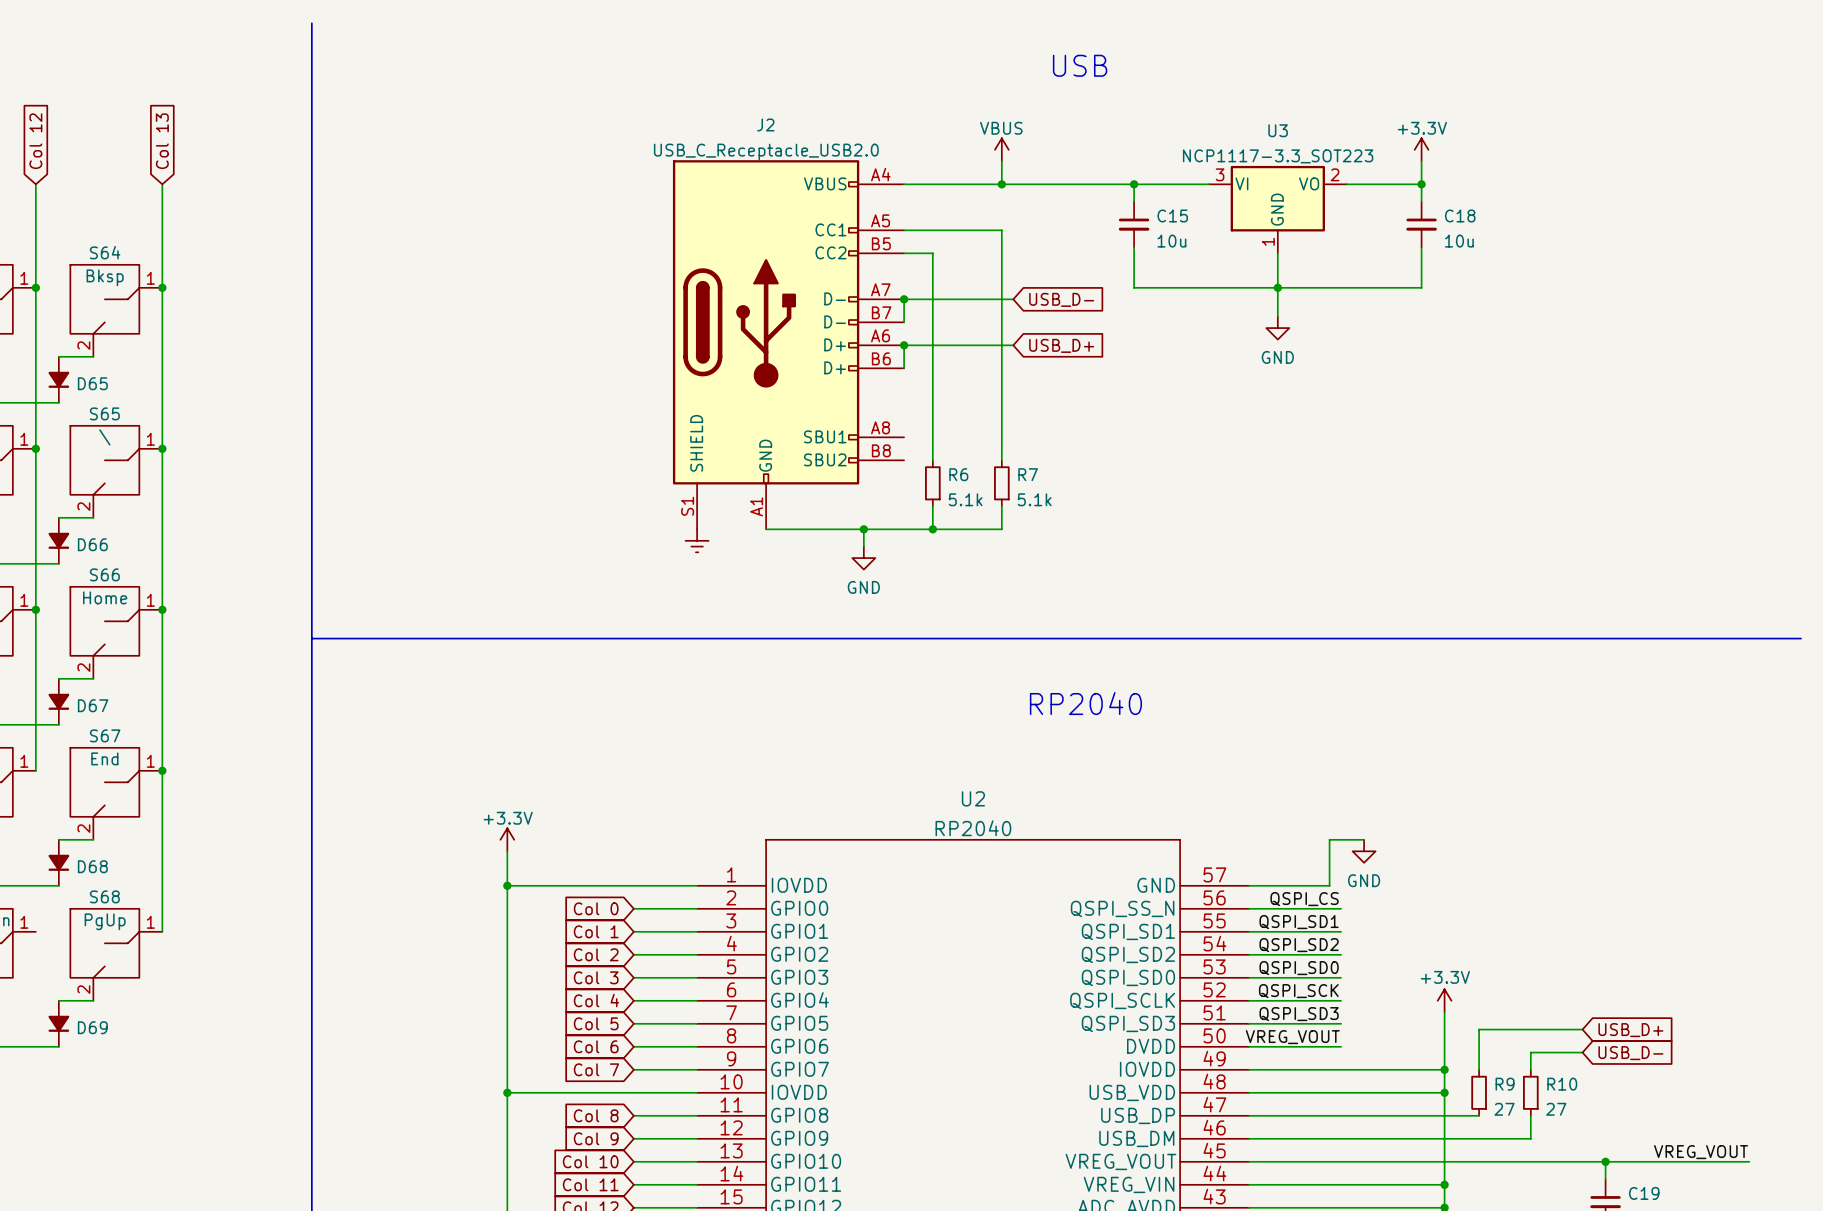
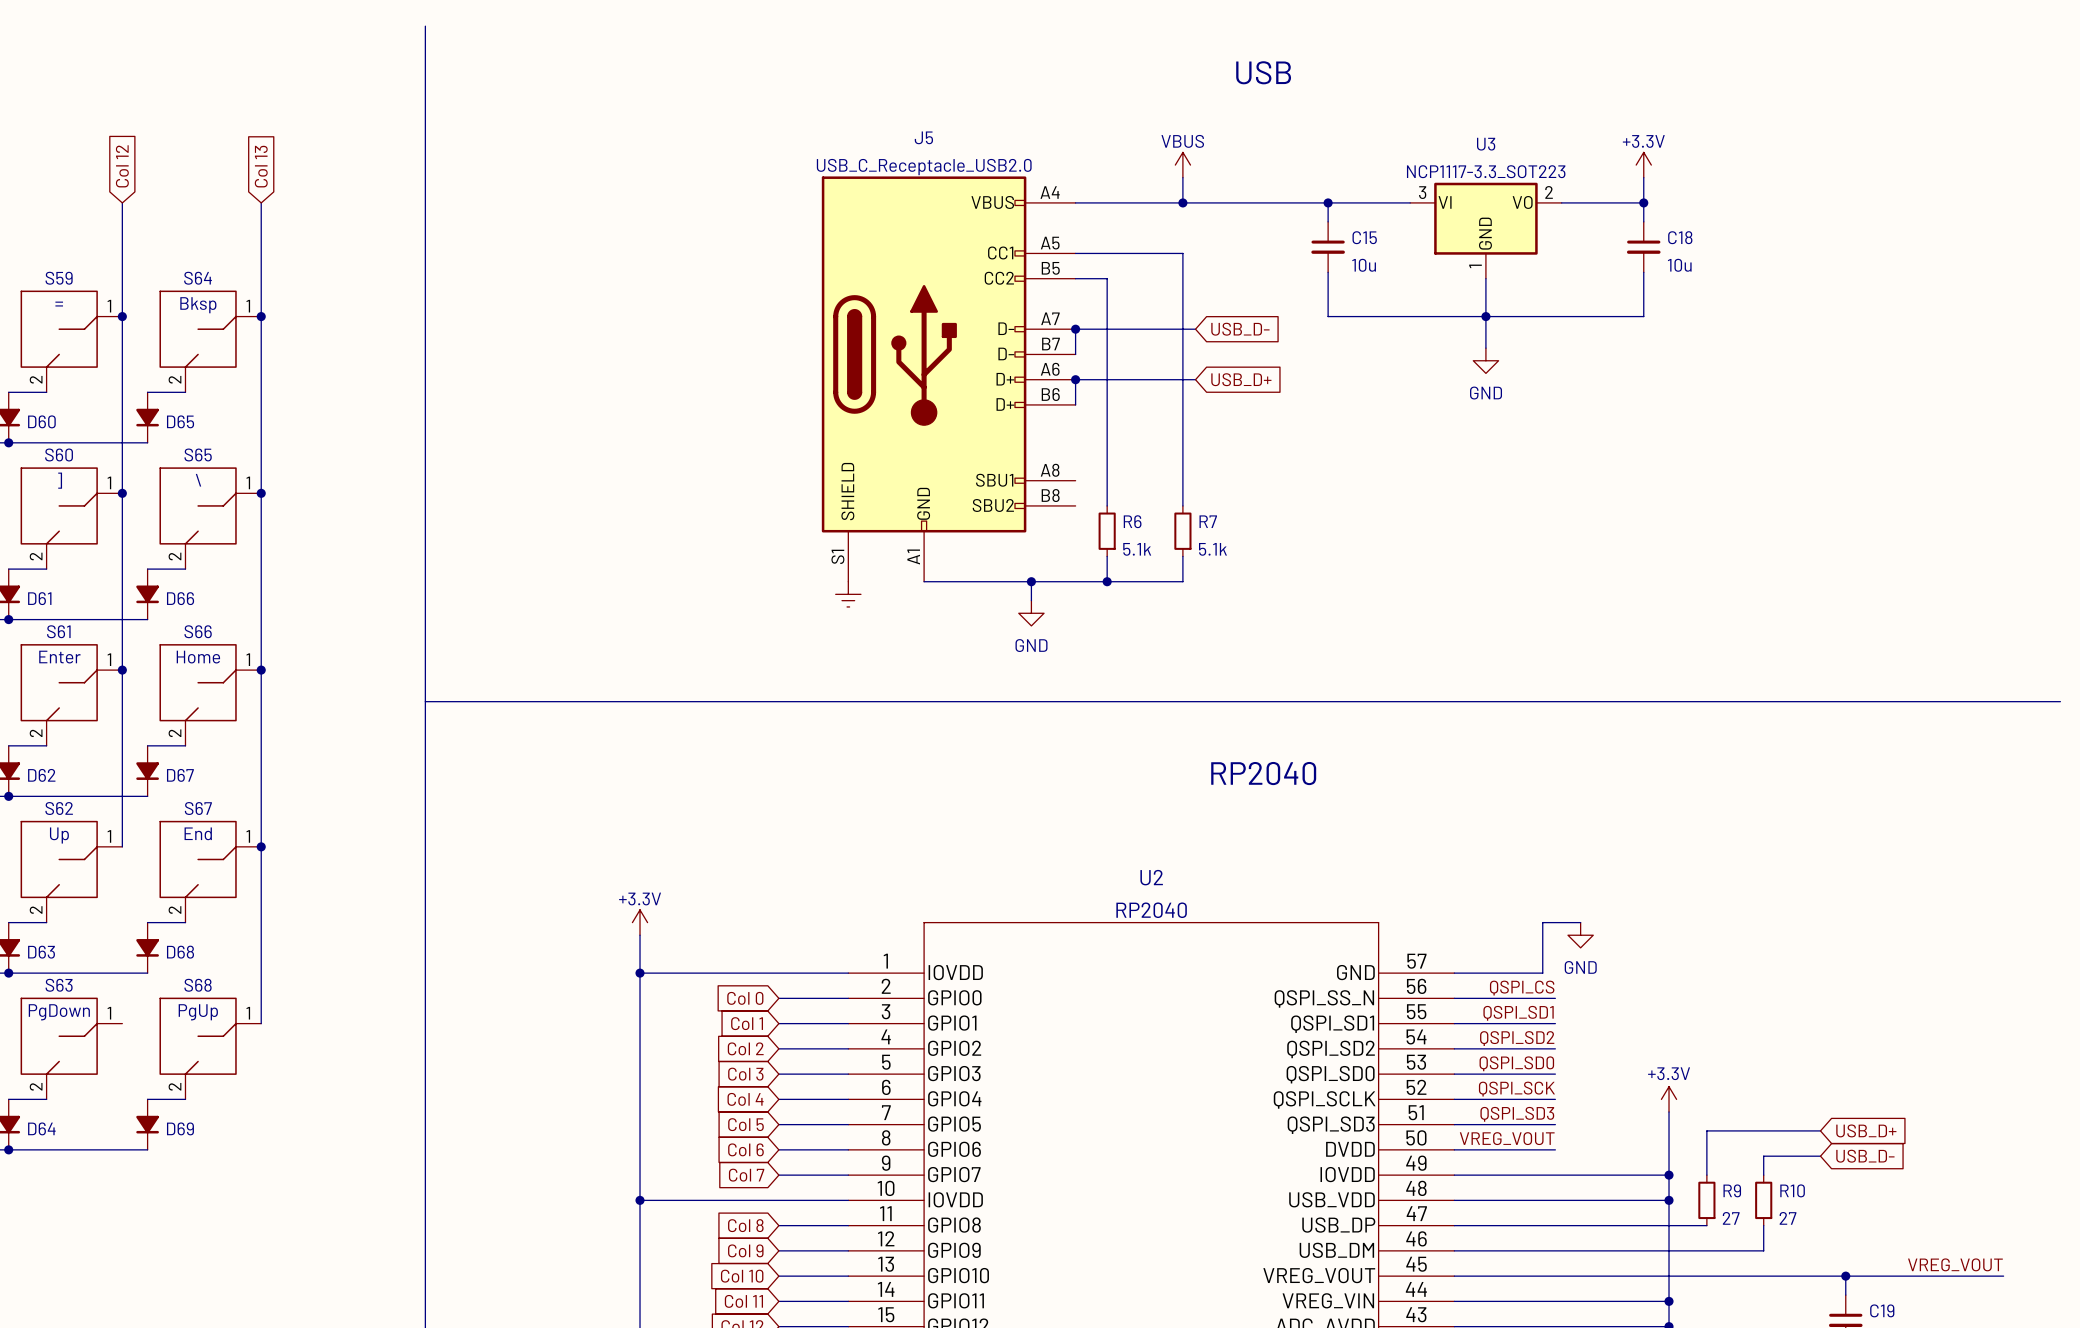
J2 name: J2 (765, 124) -> J5 (923, 137)

